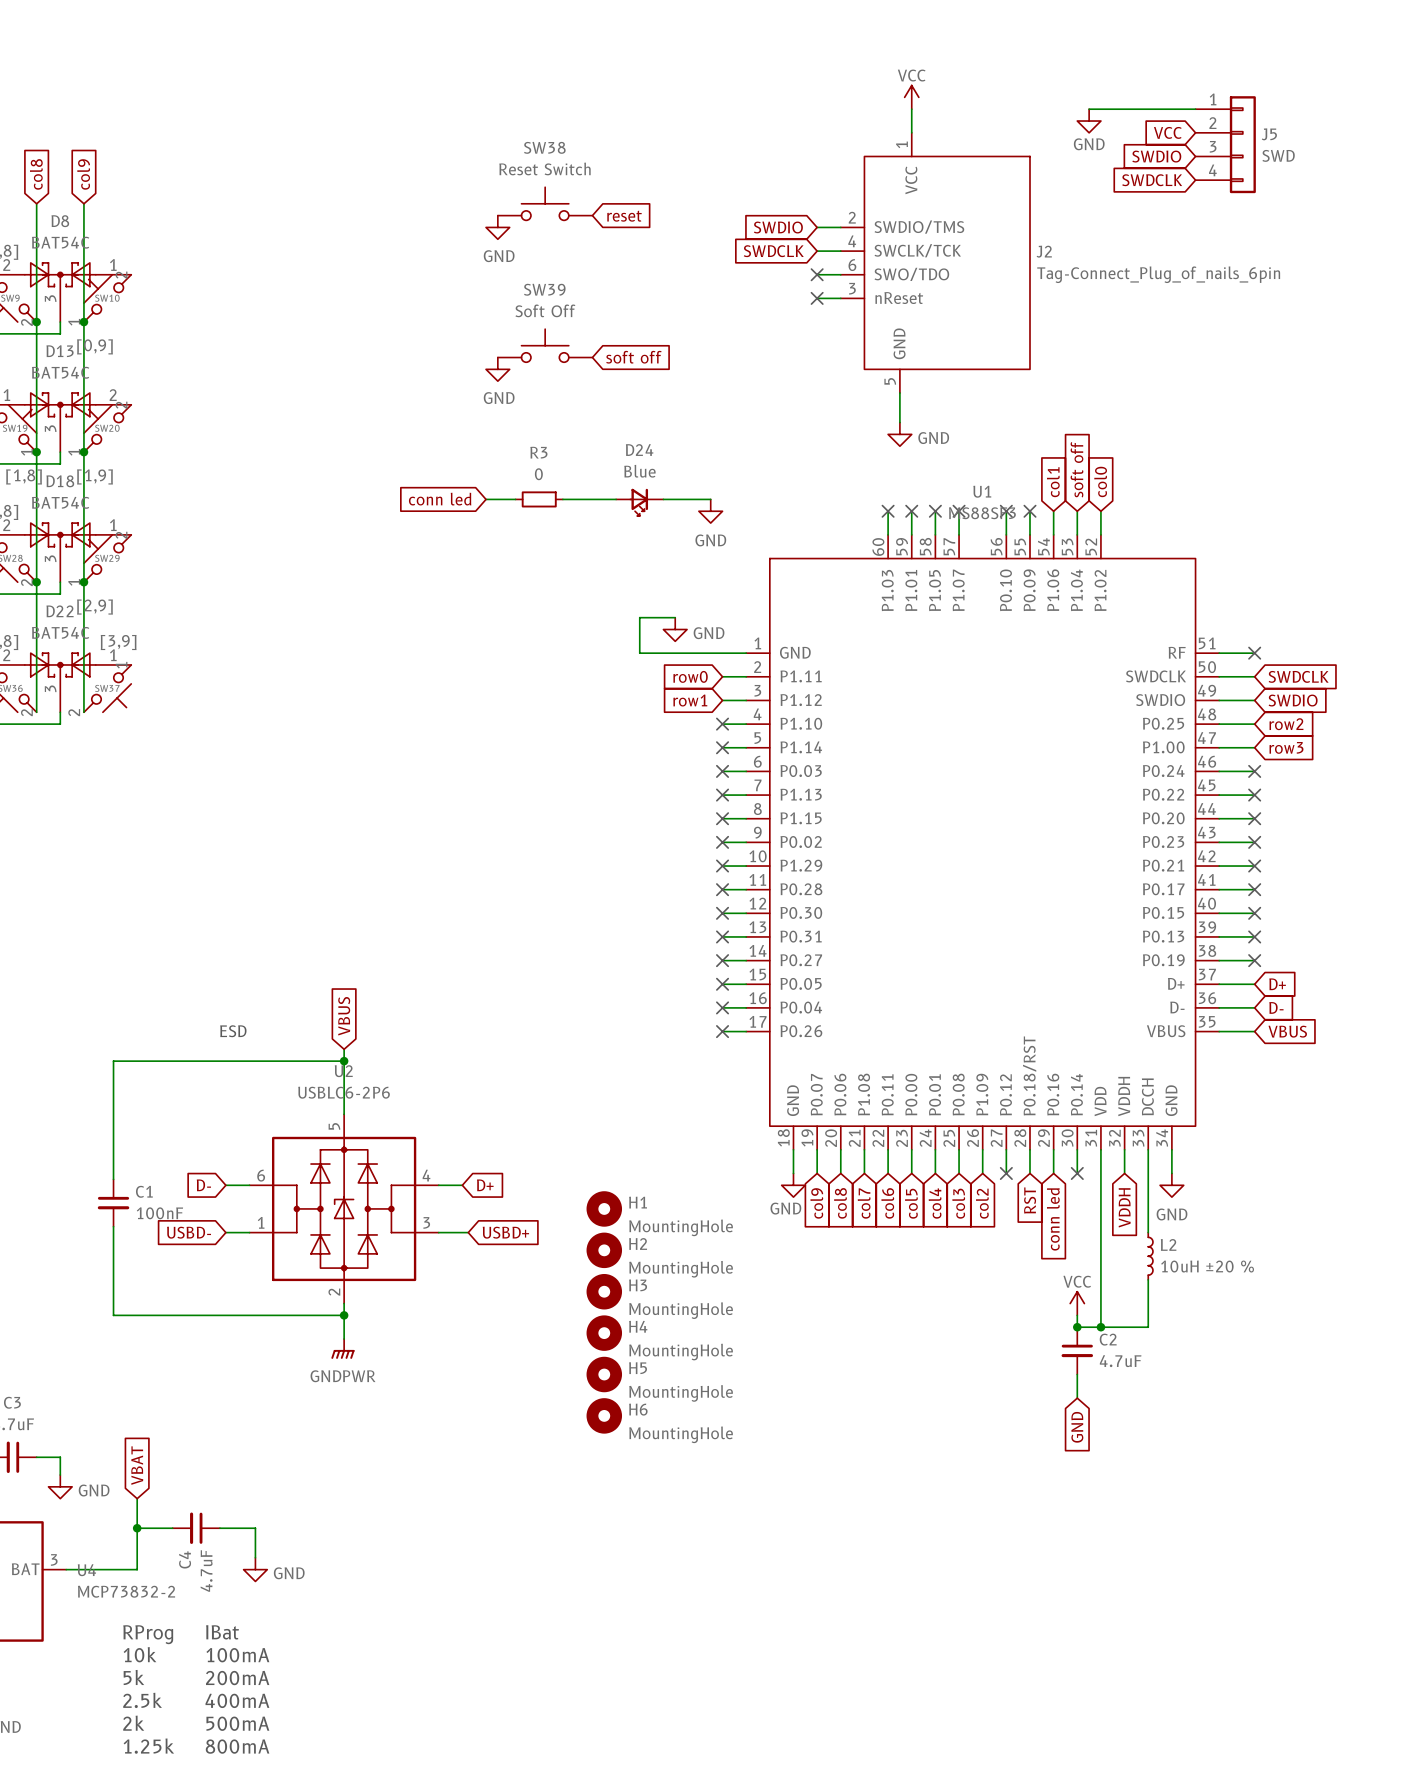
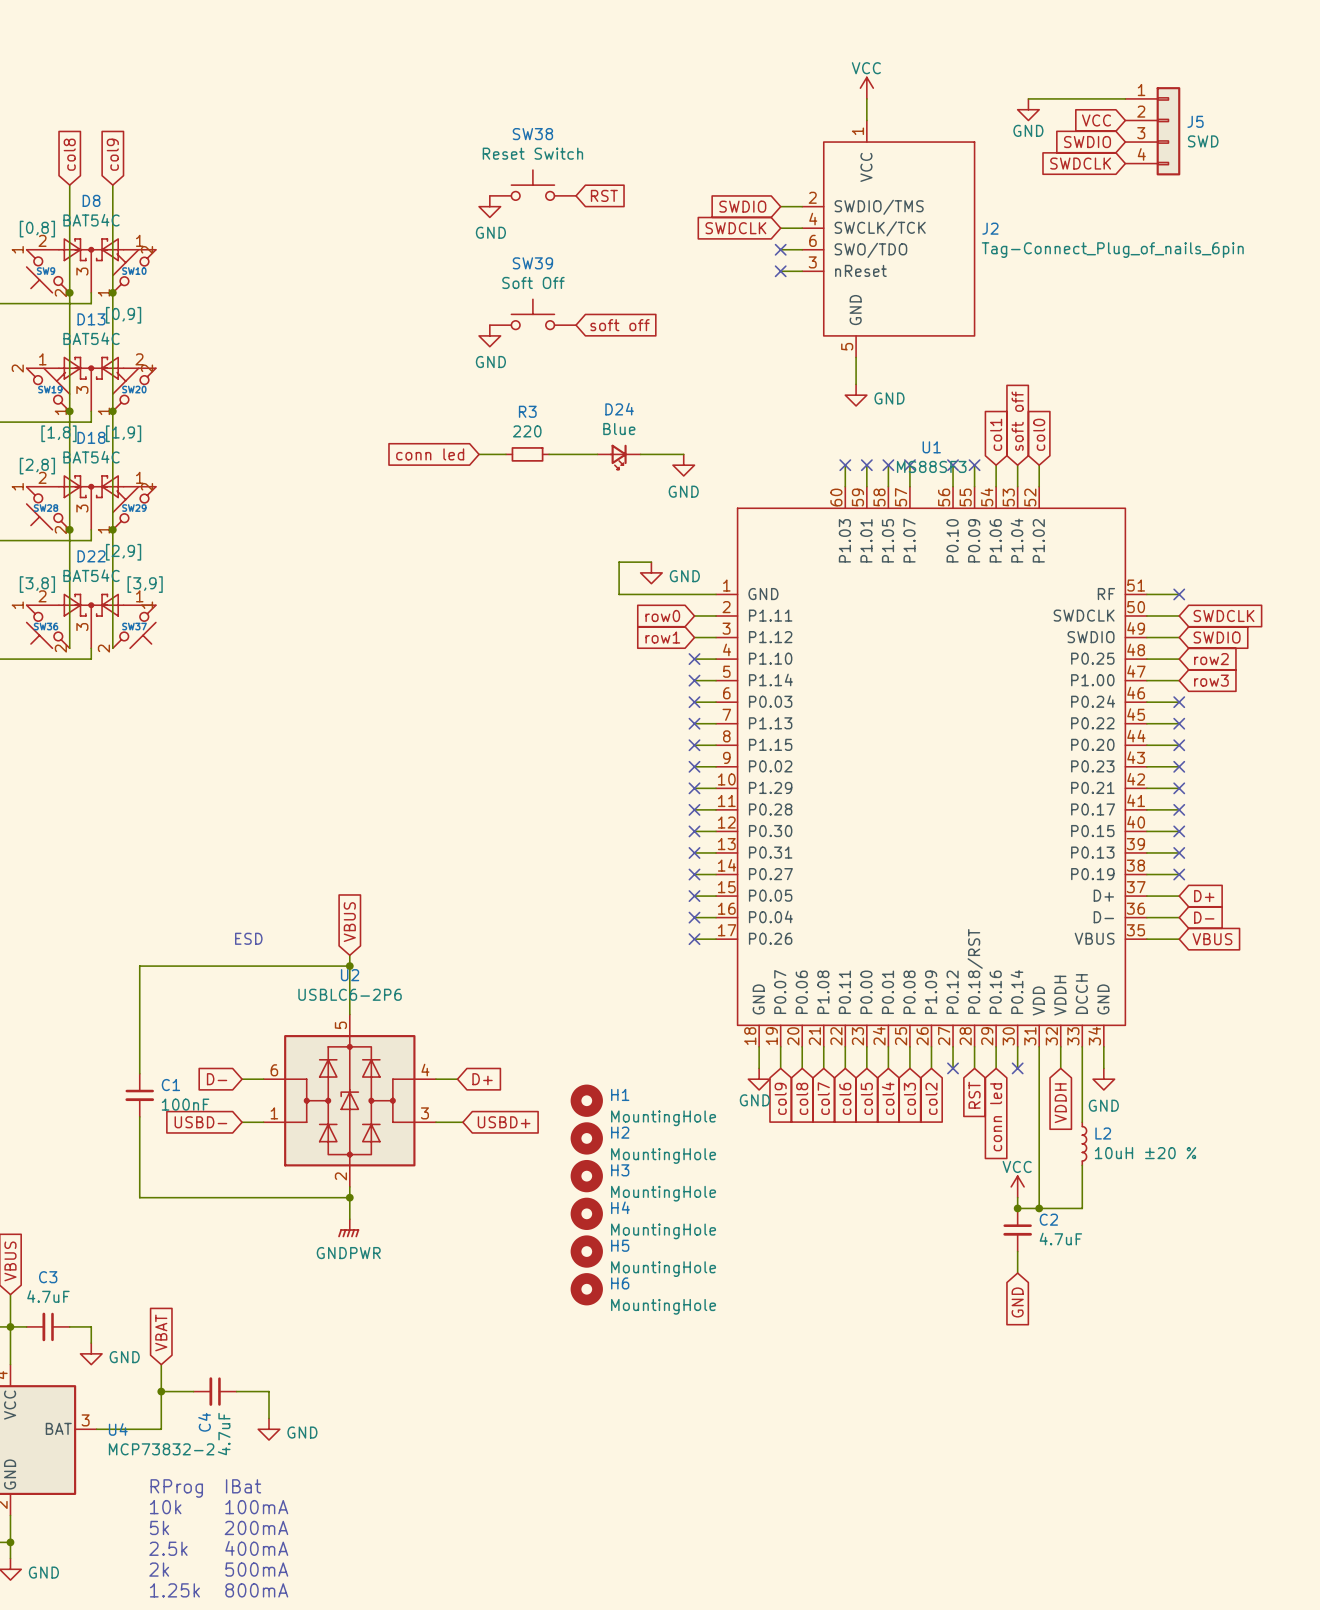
global label: reset (624, 216) -> RST (604, 195)
R3 value: 0 (538, 474) -> 220 (527, 431)

